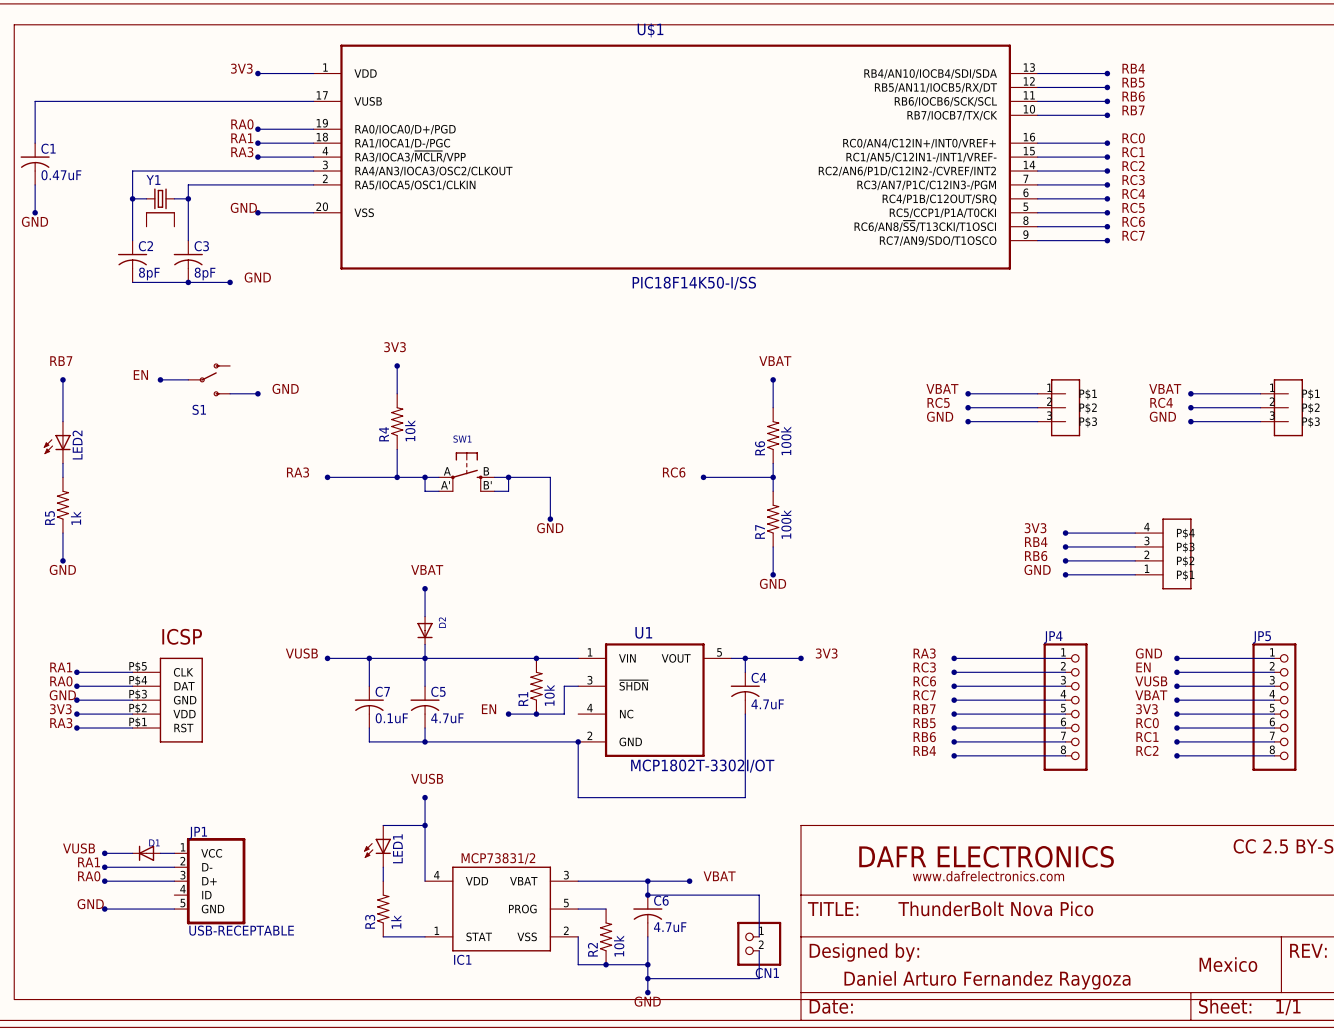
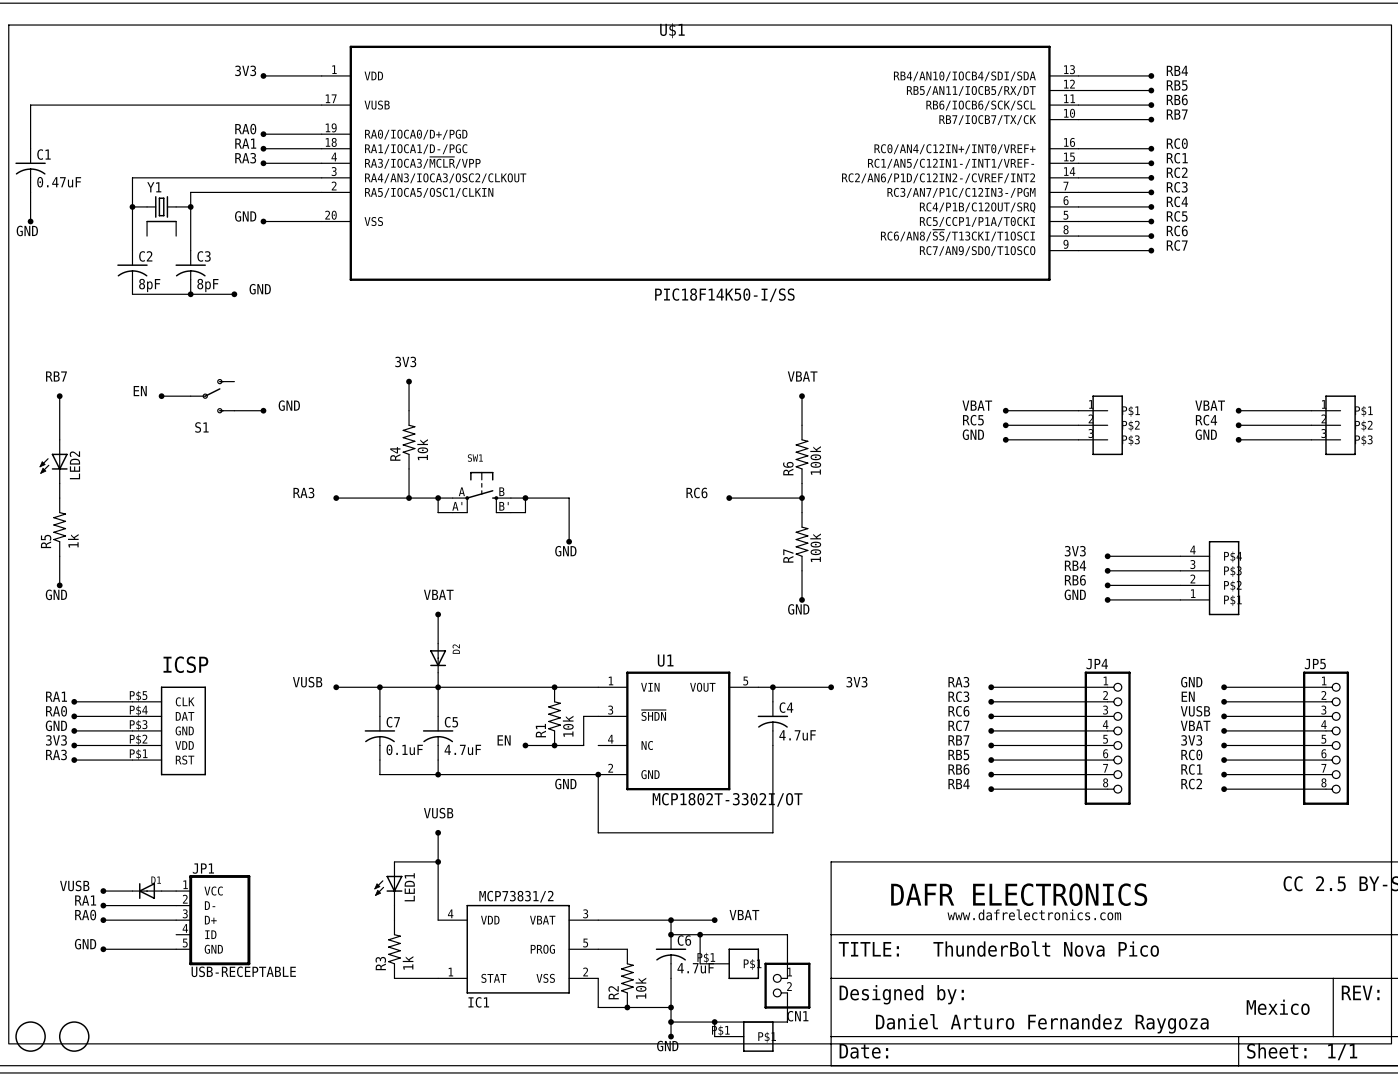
label: none -> GND (565, 784)
wire: none -> (700, 934) (700, 963)
junction: none -> (700, 934)
part: none -> (729, 963)
wire: none -> (714, 1022) (714, 1036)
junction: none -> (714, 1022)
part: none -> (30, 1036)
part: none -> (74, 1036)
part: none -> (744, 1036)

